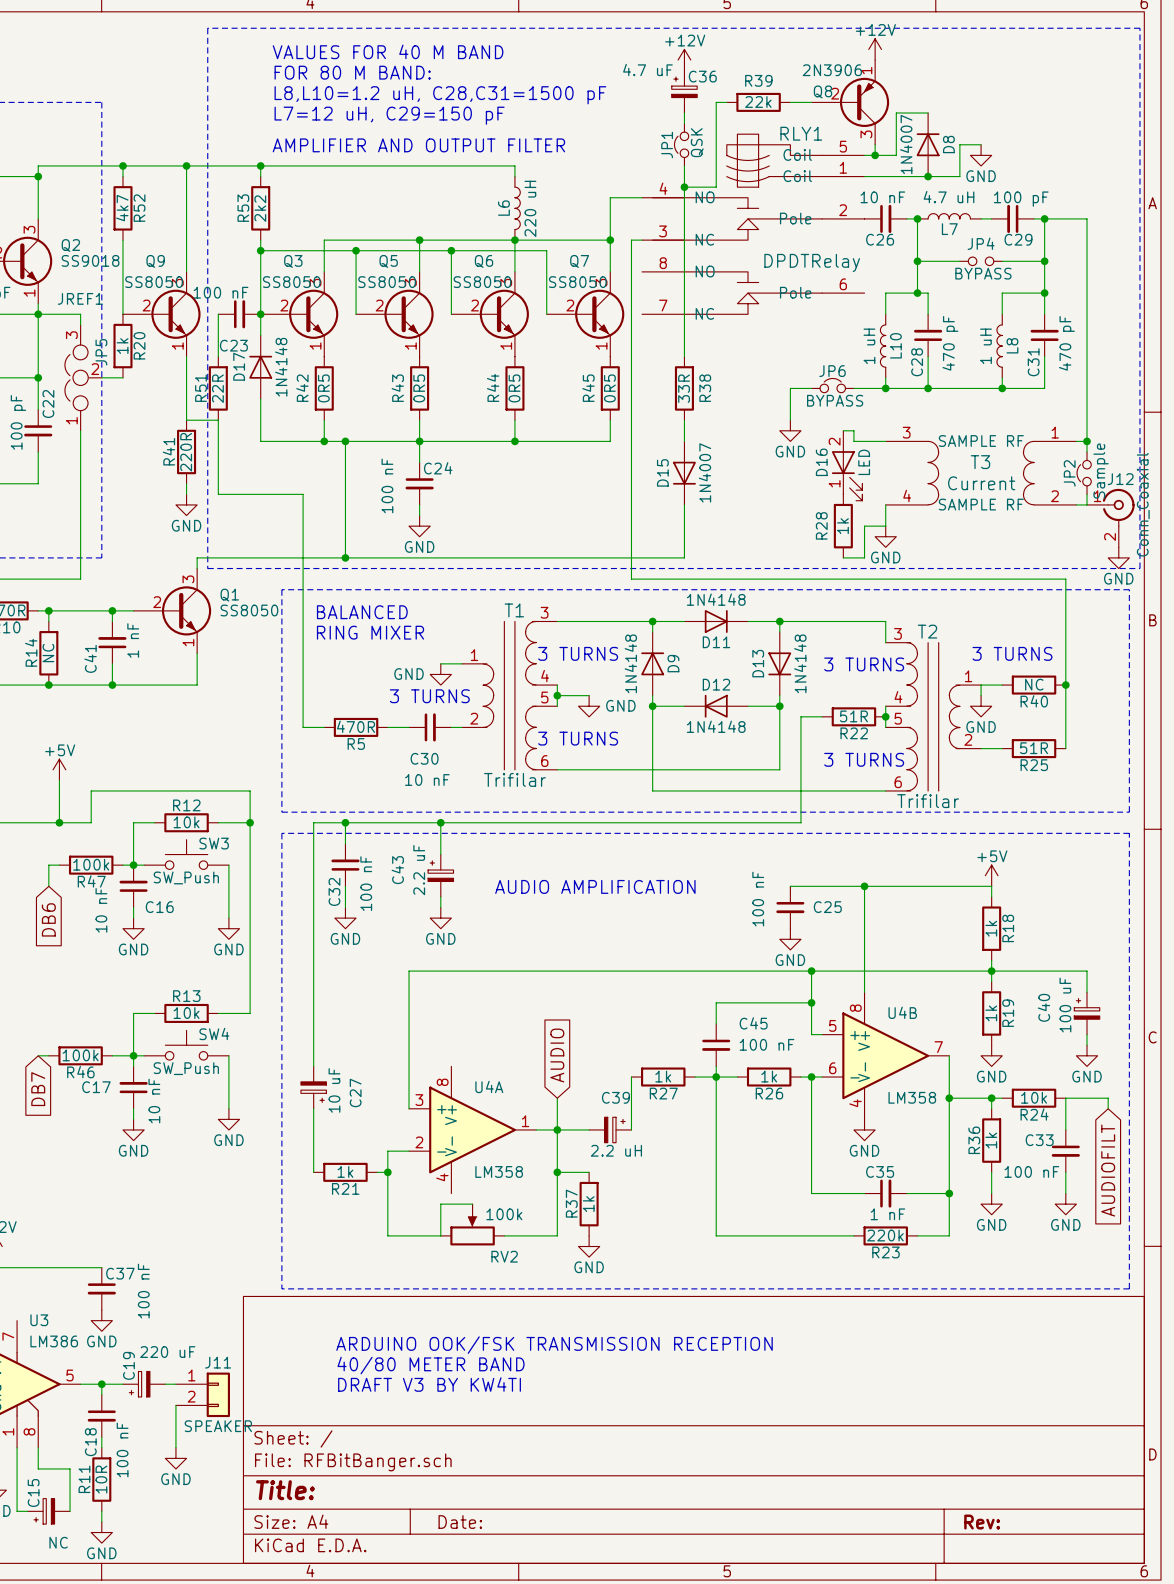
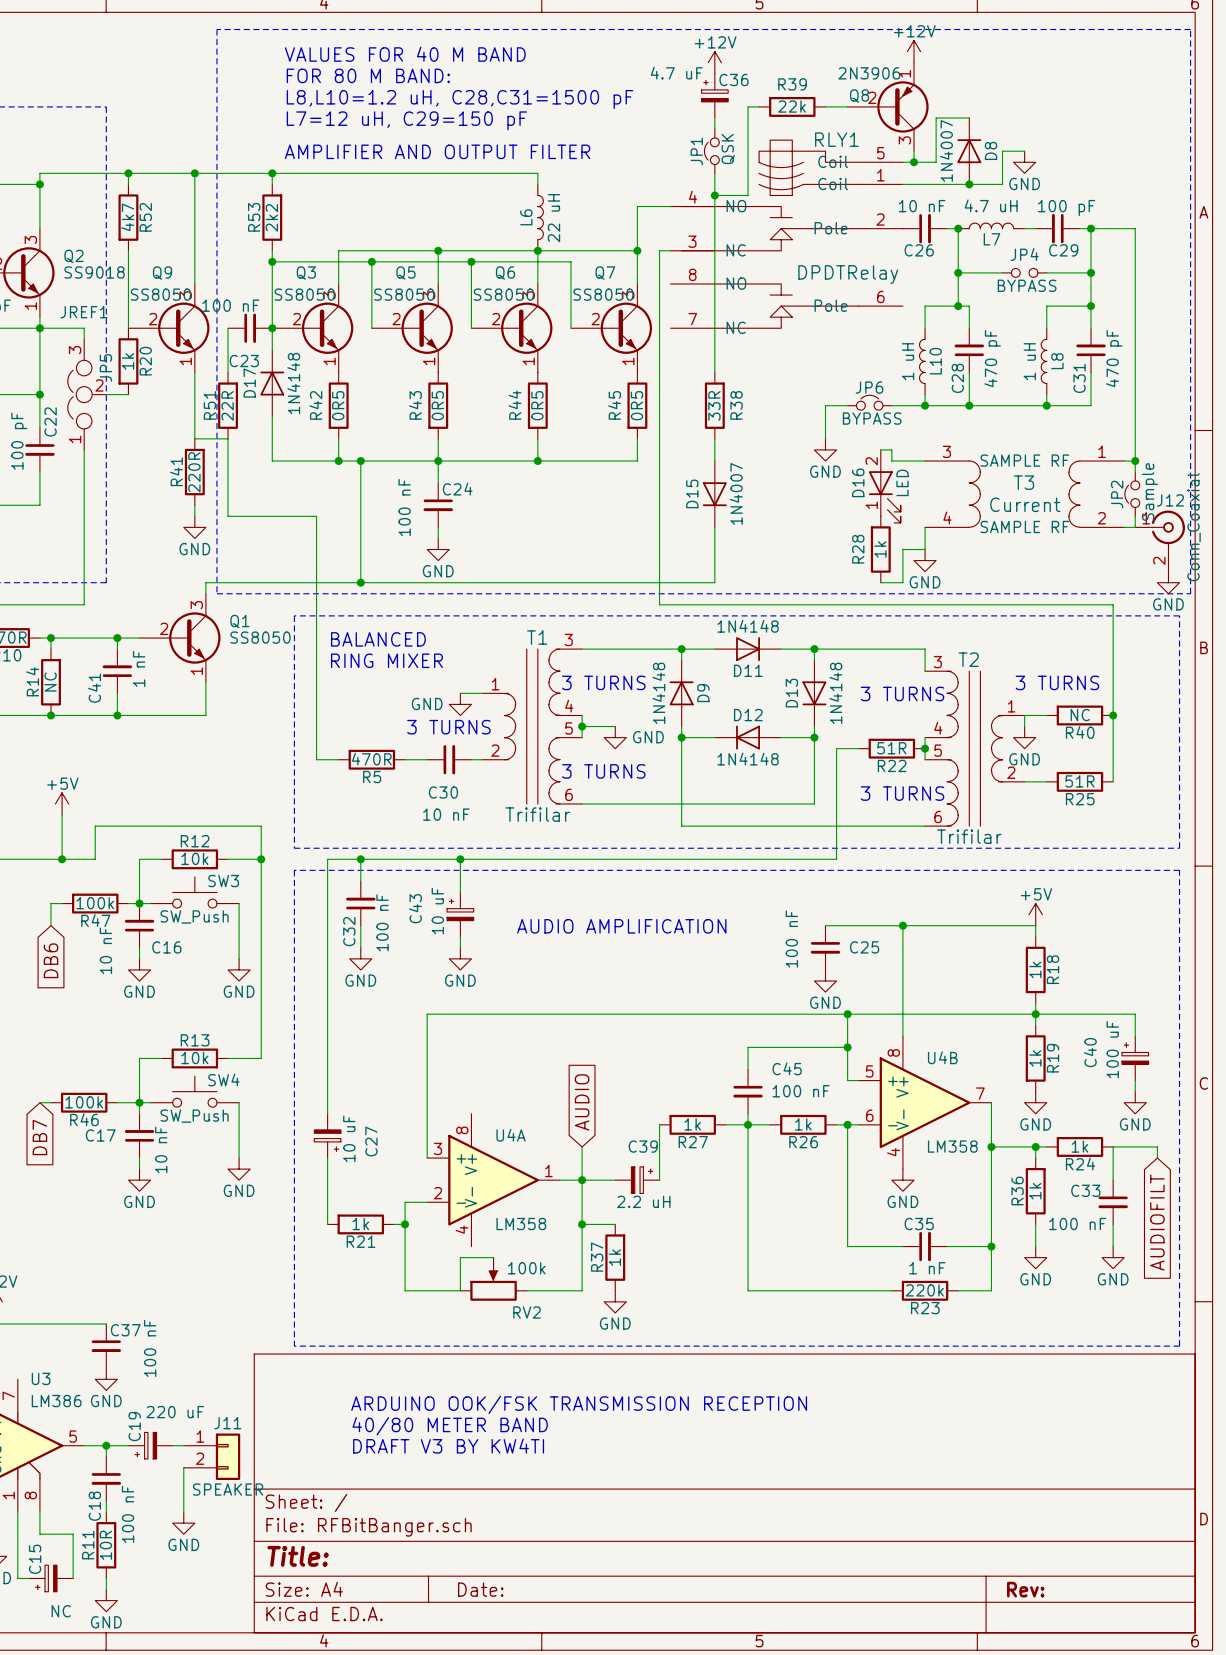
L6 value: 220 uH (530, 208) -> 22 uH (554, 218)
C43 value: 2.2 uF (419, 870) -> 10 uF (437, 911)
R24 value: 10k (1034, 1097) -> 1k (1079, 1146)

